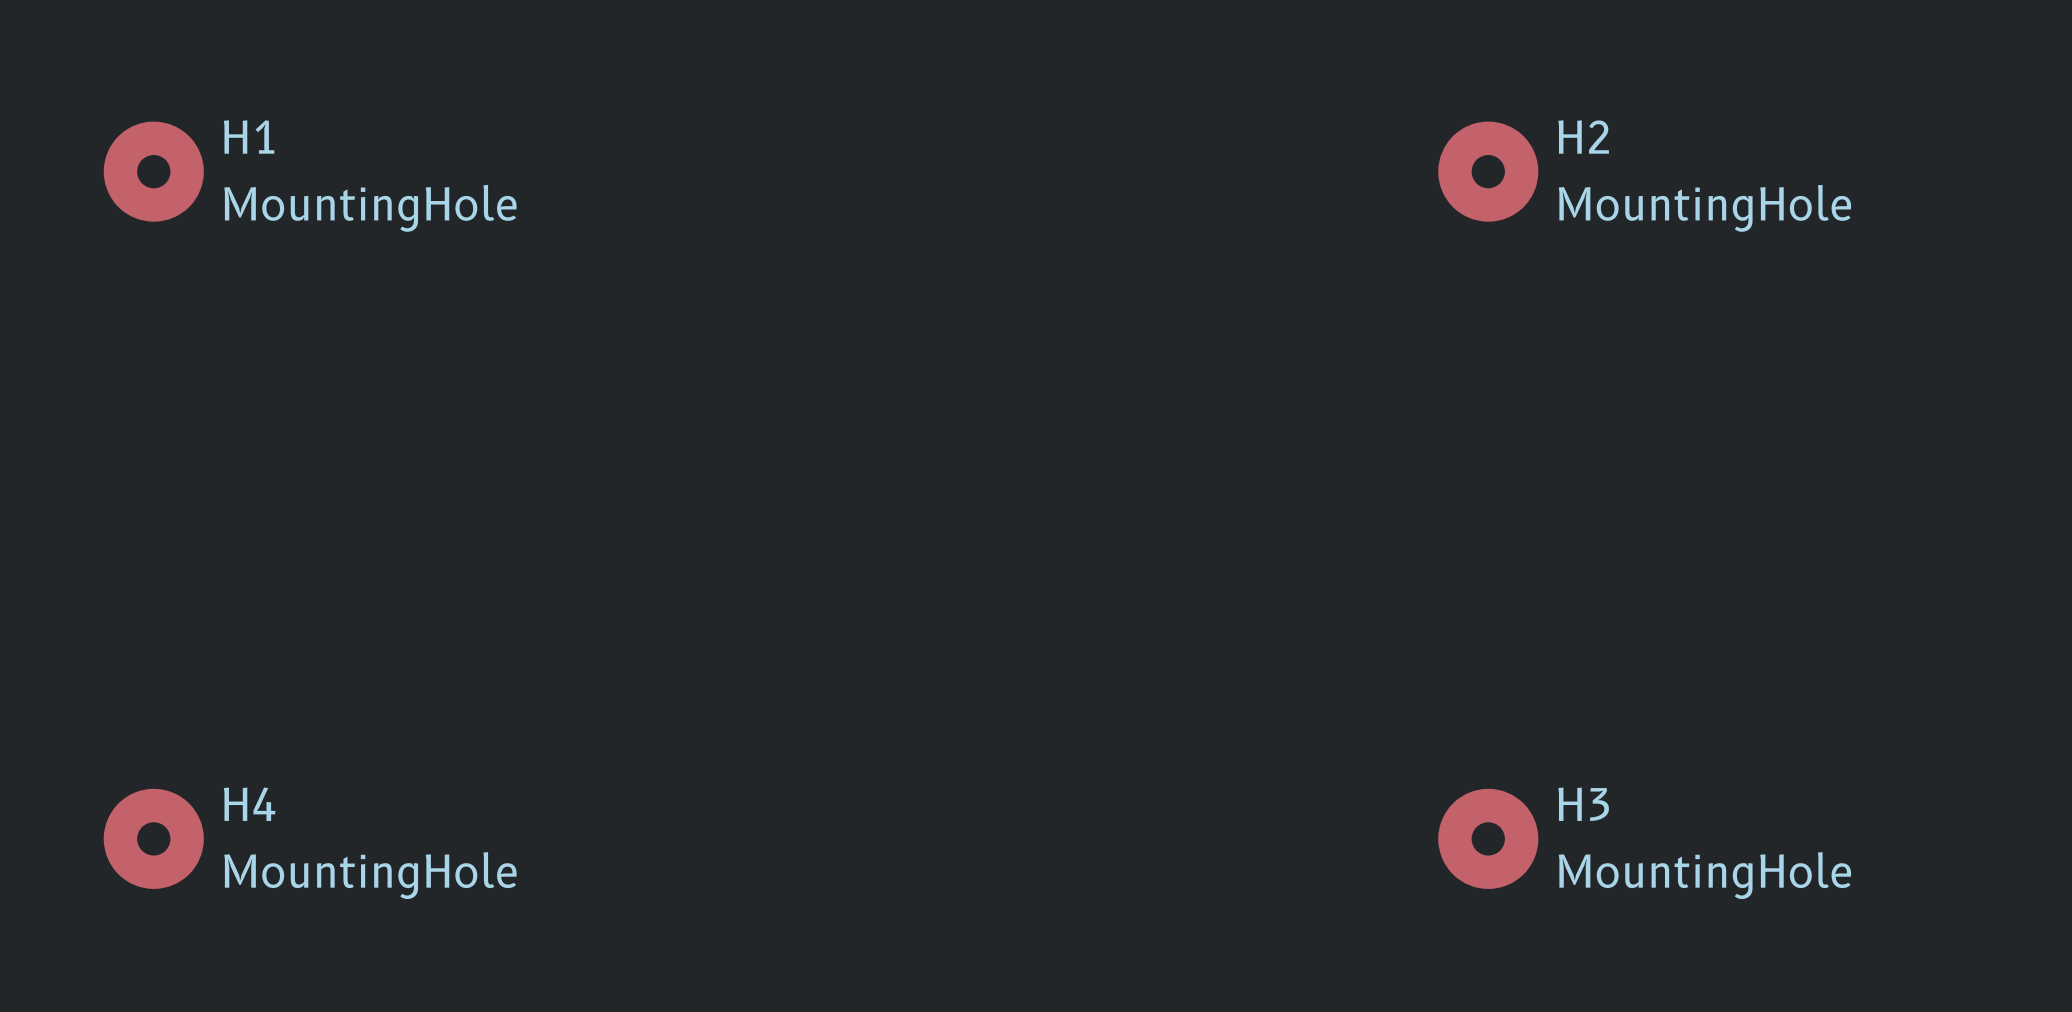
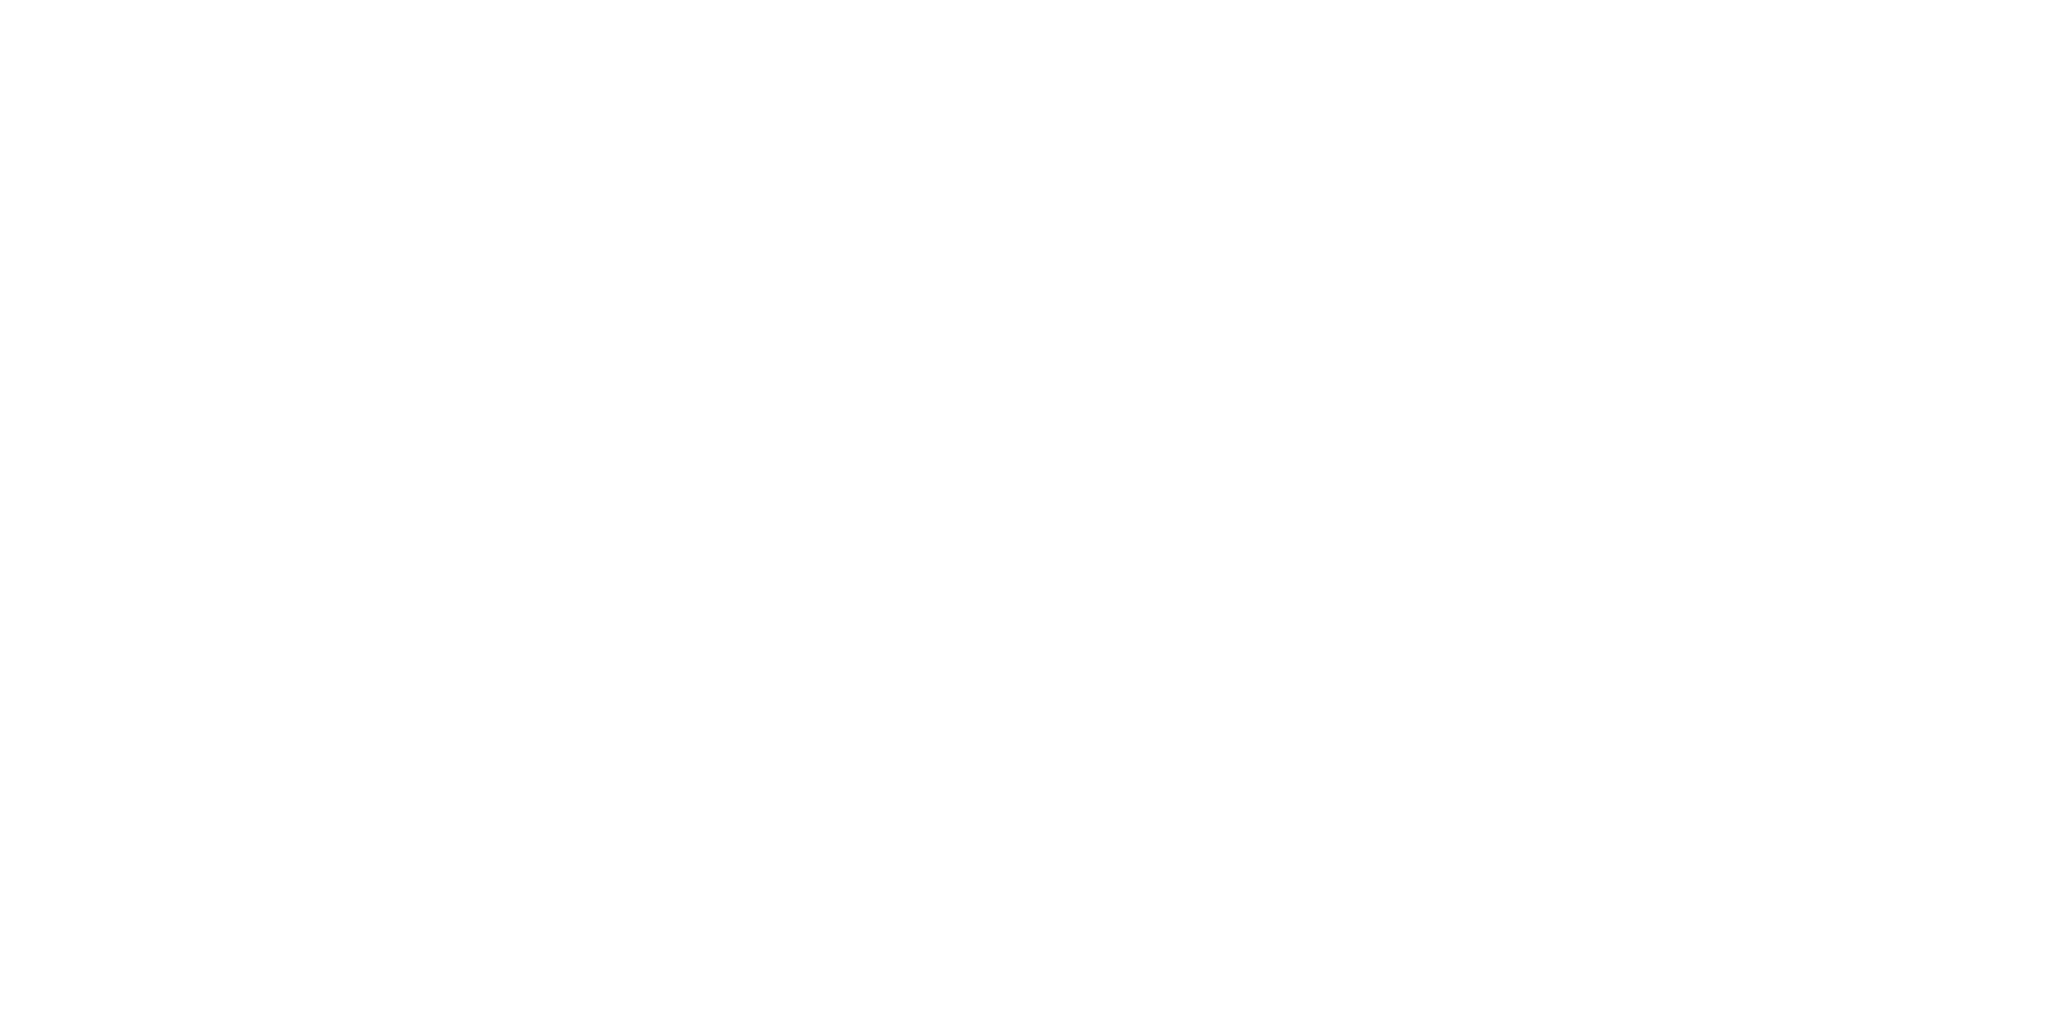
H1: MountingHole (153, 171) -> none
H2: MountingHole (1488, 171) -> none
H4: MountingHole (153, 838) -> none
H3: MountingHole (1488, 838) -> none

